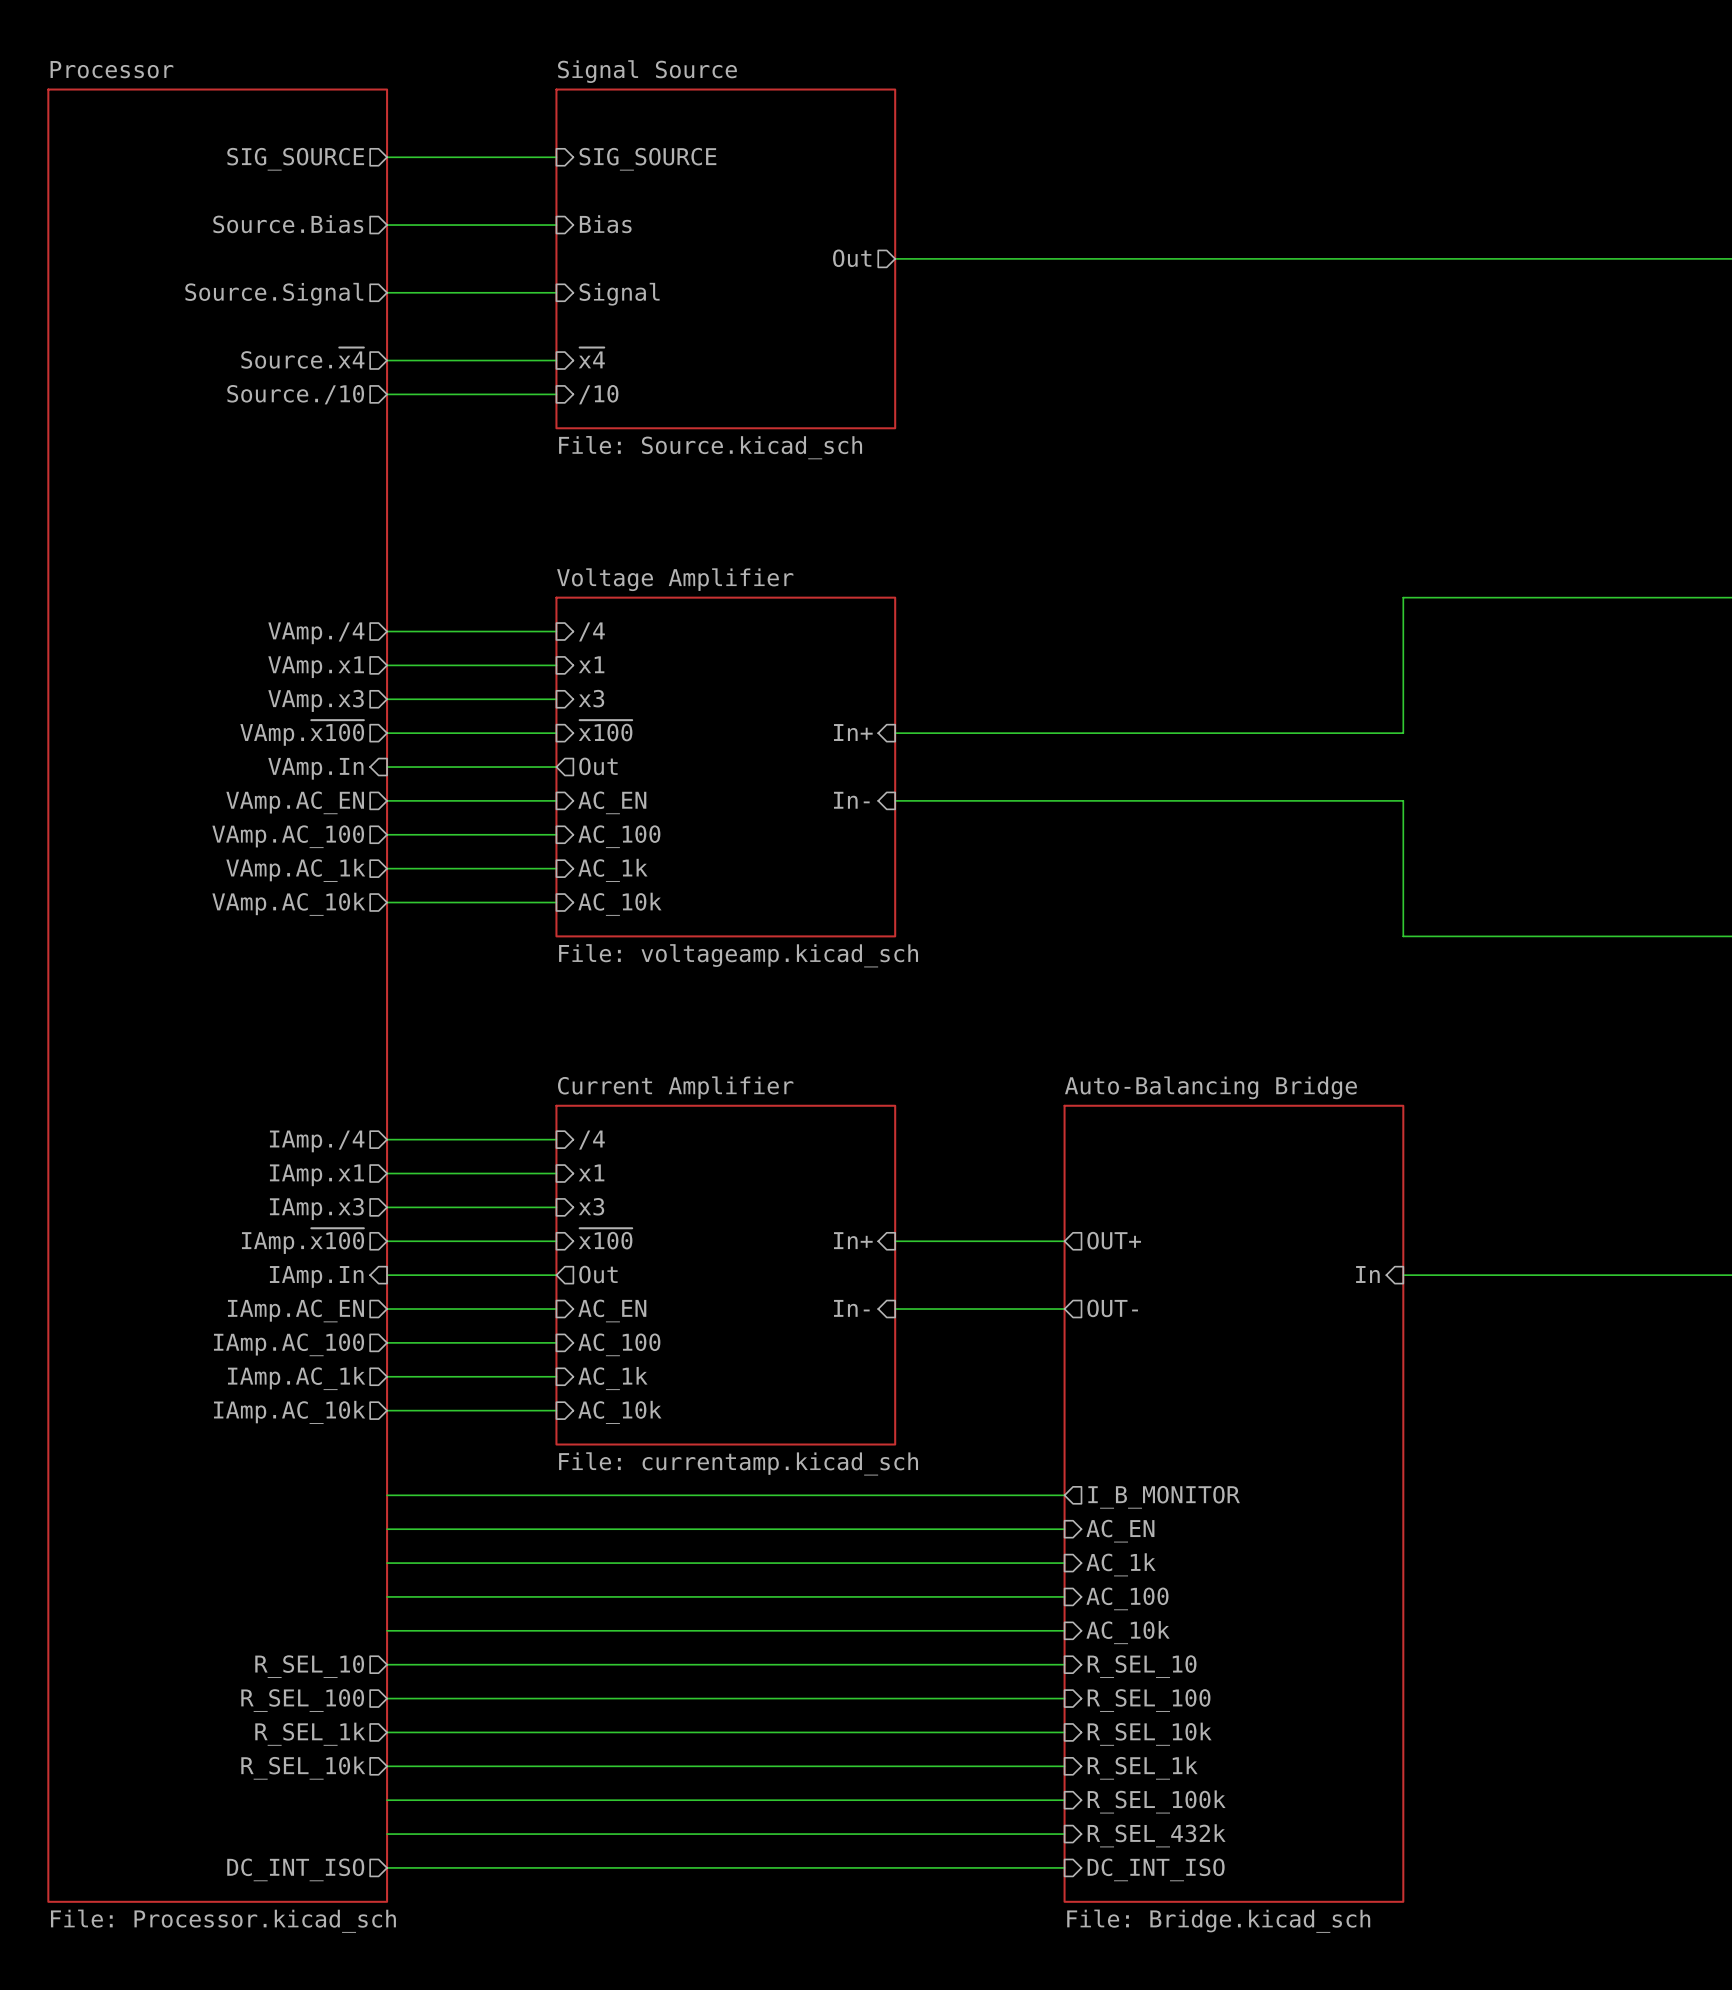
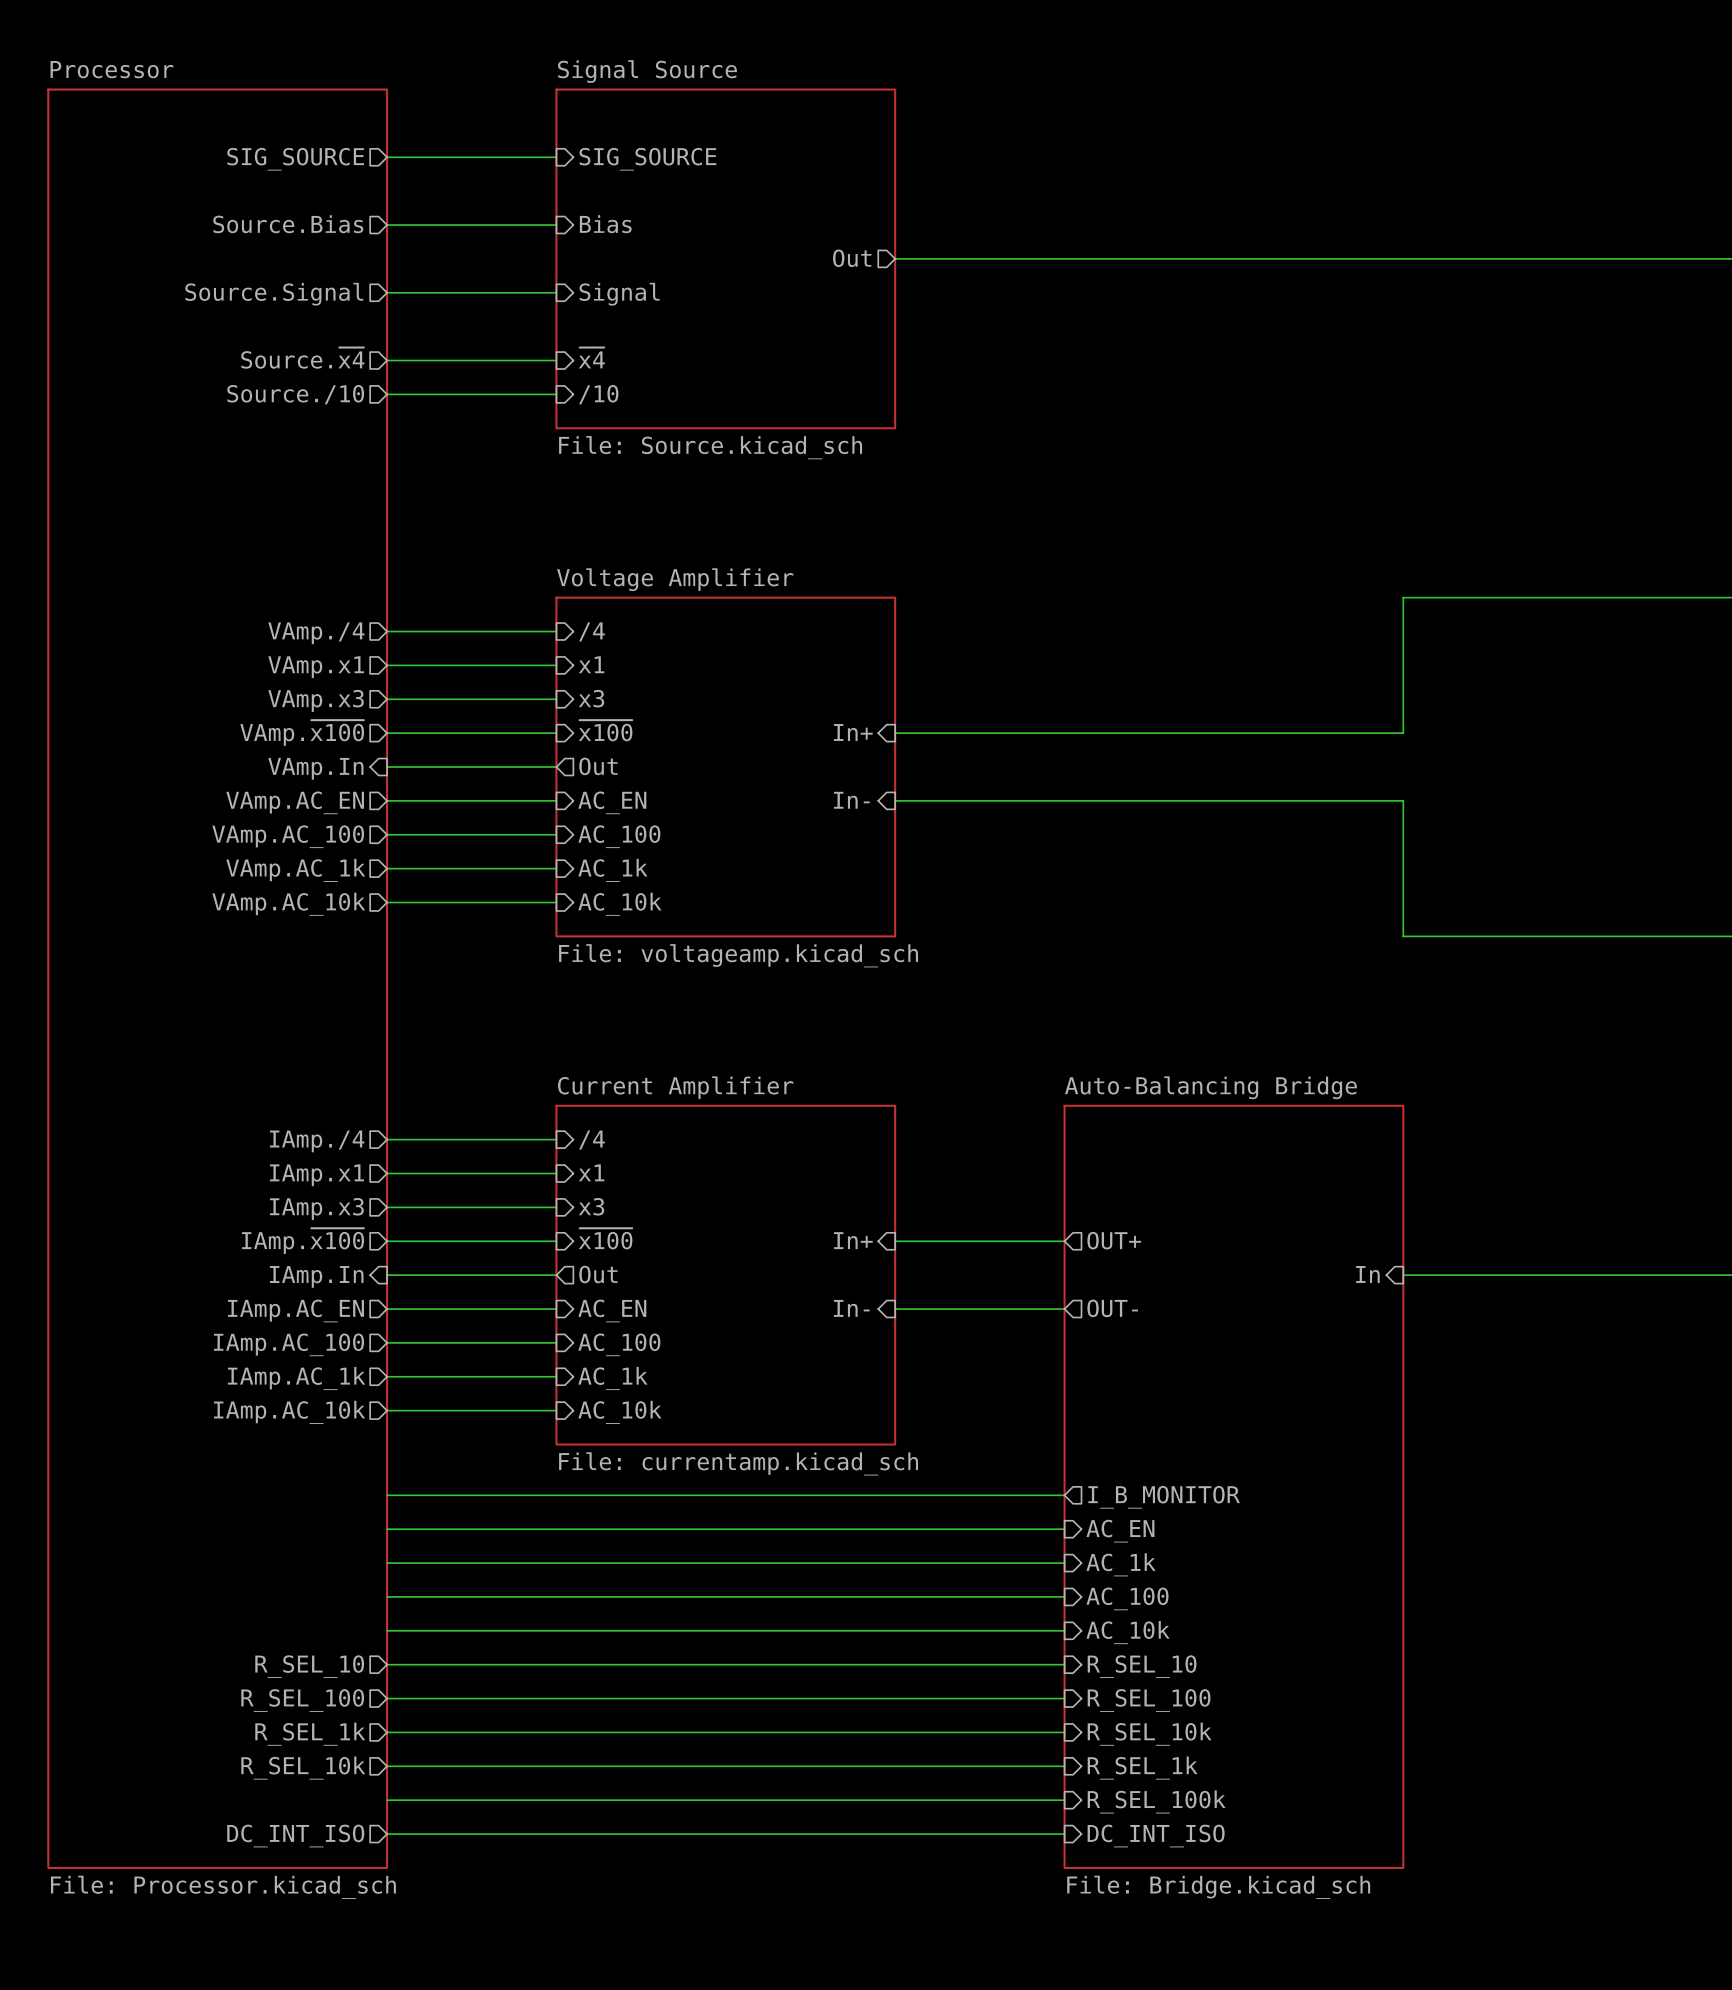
sheet Processor: none -> File: Processor.kicad_sch (217, 978)
sheet Processor: File: Processor.kicad_sch (217, 995) -> none
sheet Auto-Balancing Bridge: none -> File: Bridge.kicad_sch (1233, 1486)
sheet Auto-Balancing Bridge: File: Bridge.kicad_sch (1233, 1503) -> none
sheet pin: R_SEL_432k (1156, 1835) -> DC_INT_ISO (1156, 1836)
wire: (387, 1867) (1064, 1867) -> none
sheet pin position: DC_INT_ISO (295, 1869) -> DC_INT_ISO (295, 1836)
sheet pin: DC_INT_ISO (1156, 1869) -> none

